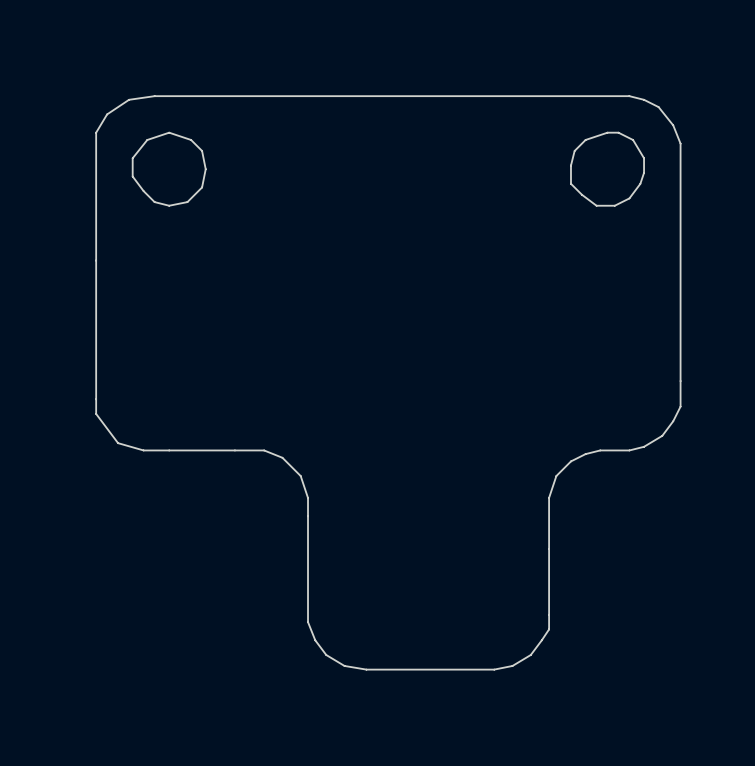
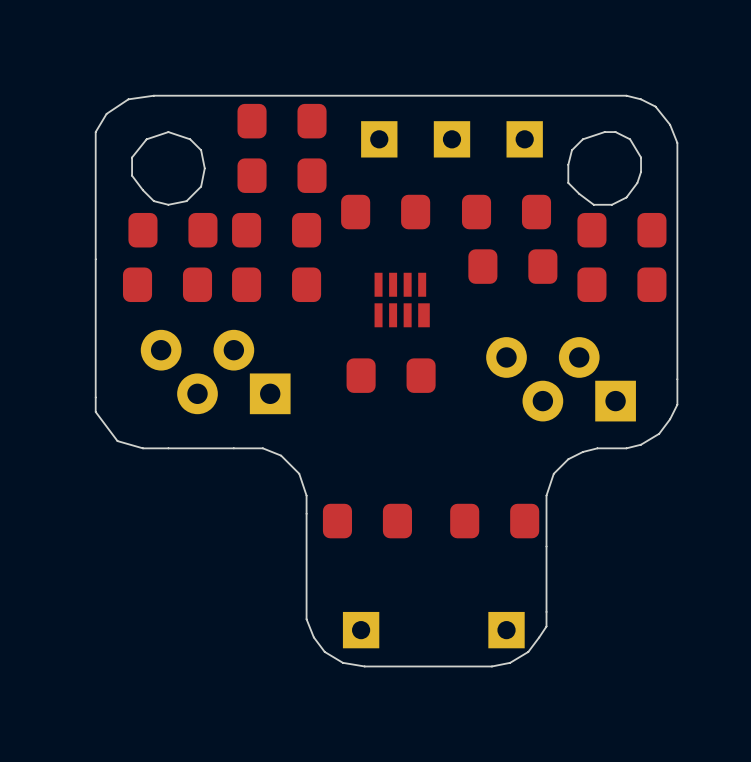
part: none -> (282, 121)
part: none -> (379, 139)
part: none -> (451, 139)
part: none -> (524, 139)
part: none -> (282, 175)
part: none -> (385, 212)
part: none -> (506, 212)
part: none -> (172, 230)
part: none -> (276, 230)
part: none -> (621, 230)
part: none -> (512, 266)
part: none -> (167, 284)
part: none -> (276, 284)
part: none -> (621, 284)
part: none -> (402, 300)
part: none -> (215, 372)
part: none -> (391, 375)
part: none -> (561, 379)
part: none -> (367, 521)
part: none -> (494, 521)
part: none -> (361, 630)
part: none -> (506, 630)

